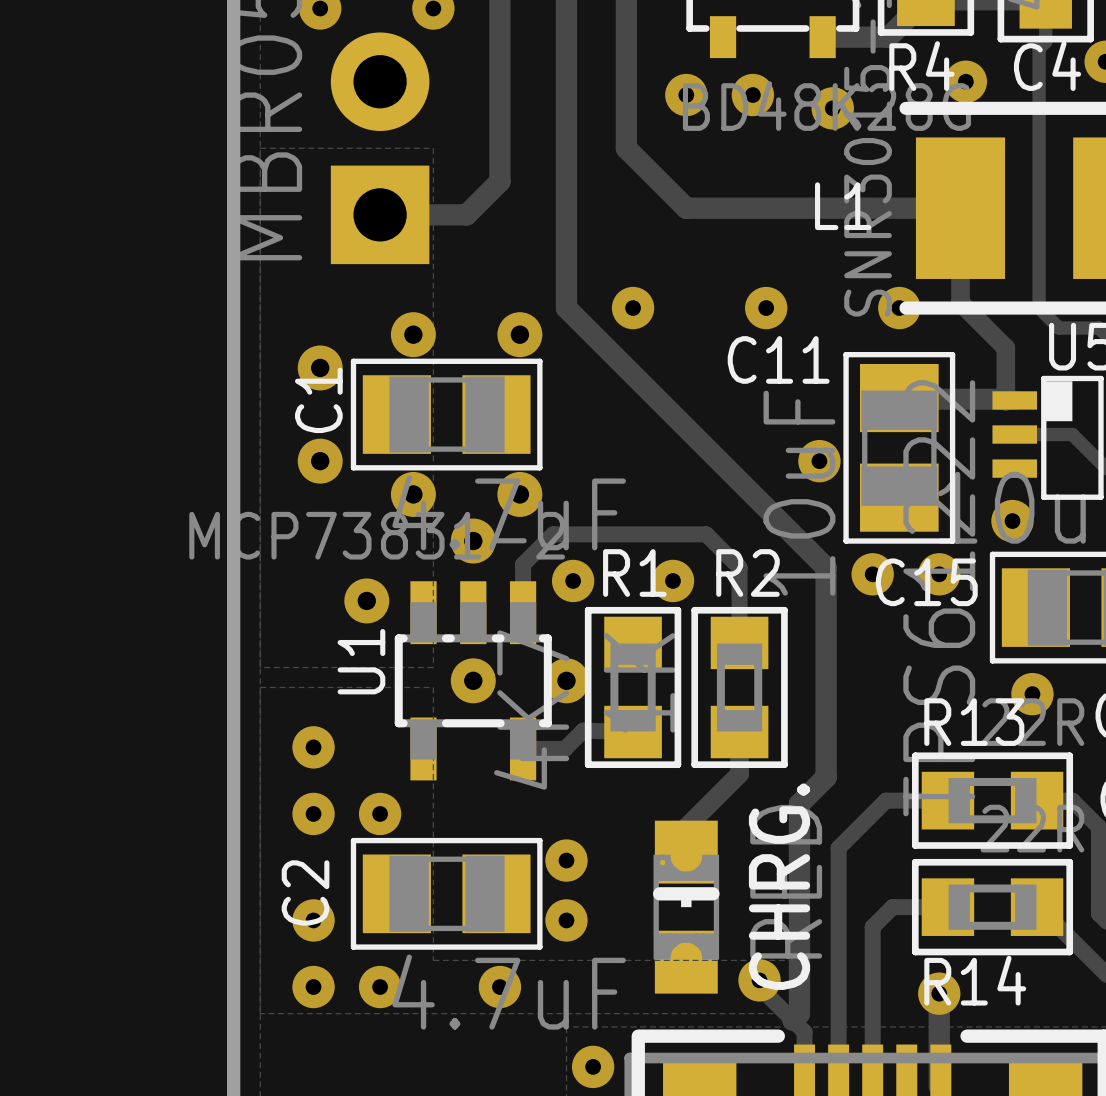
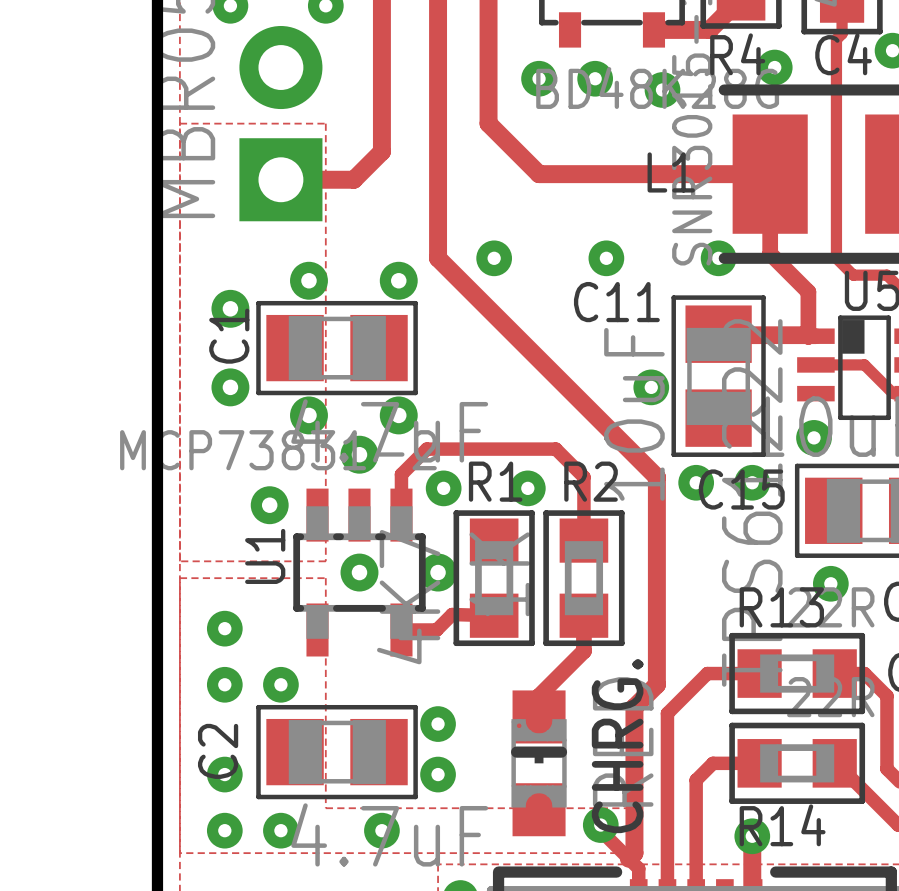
track: (826, 777) (799, 803) (799, 840) -> (656, 653) (656, 684) (634, 707)

